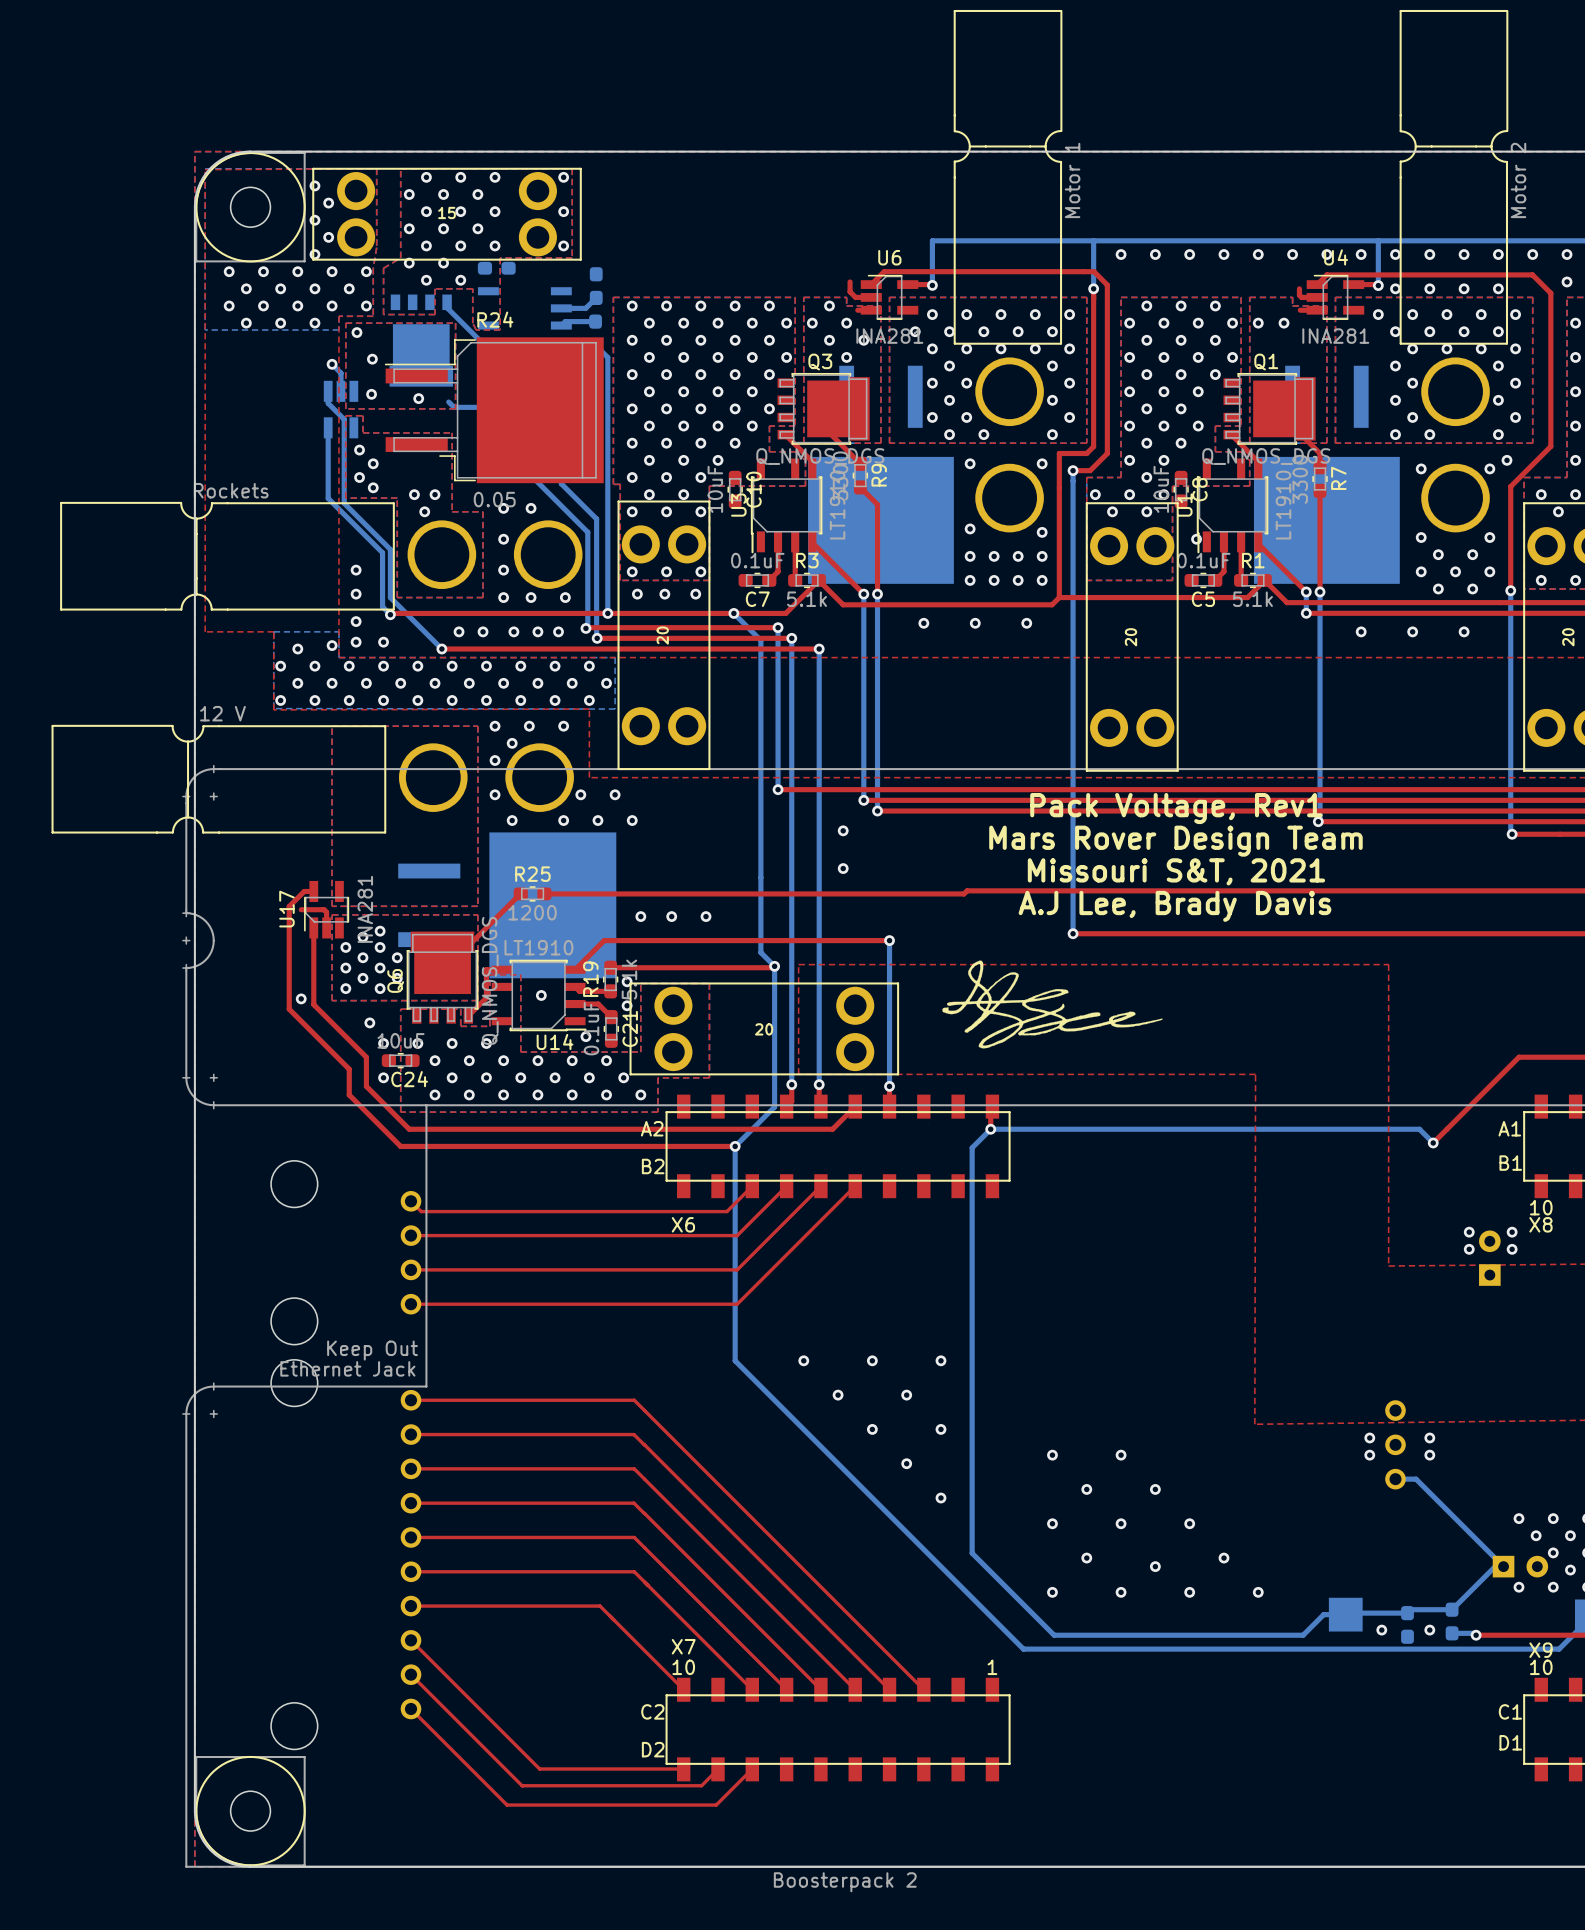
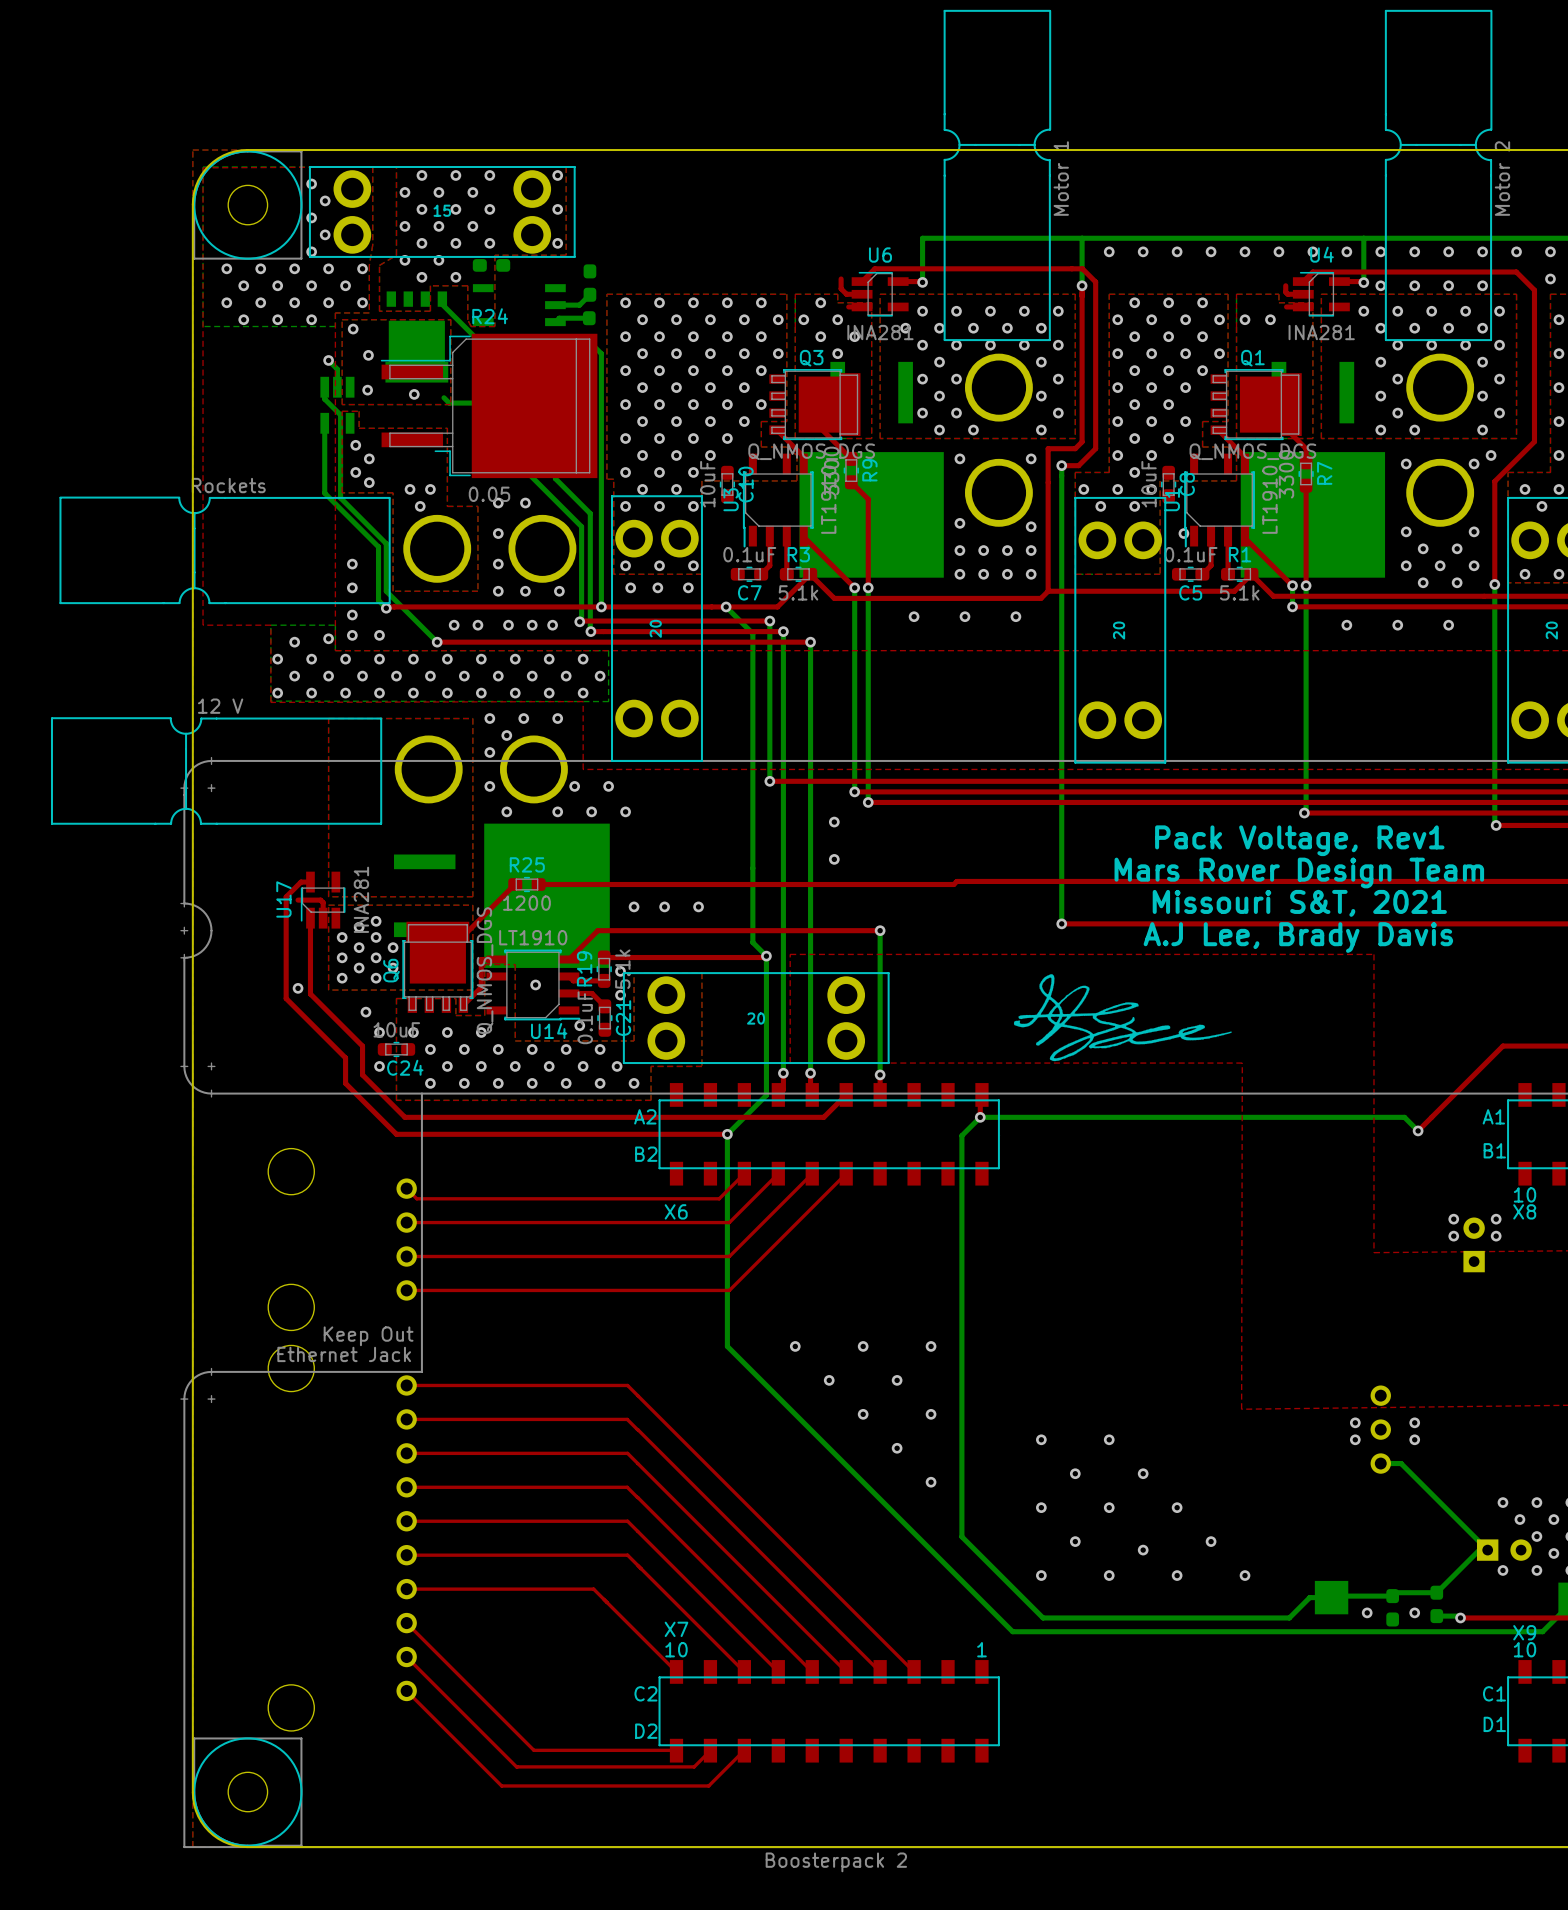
text position: Pack Voltage, Rev1 (1176, 808) -> Pack Voltage, Rev1 (1299, 840)
text position: Mars Rover Design Team (1175, 841) -> Mars Rover Design Team (1299, 873)
text position: Missouri S&T, 2021 (1176, 871) -> Missouri S&T, 2021 (1299, 903)
text position: A.J Lee, Brady Davis (1174, 906) -> A.J Lee, Brady Davis (1298, 937)
drawing position: (1045, 1042) -> (1115, 1054)

